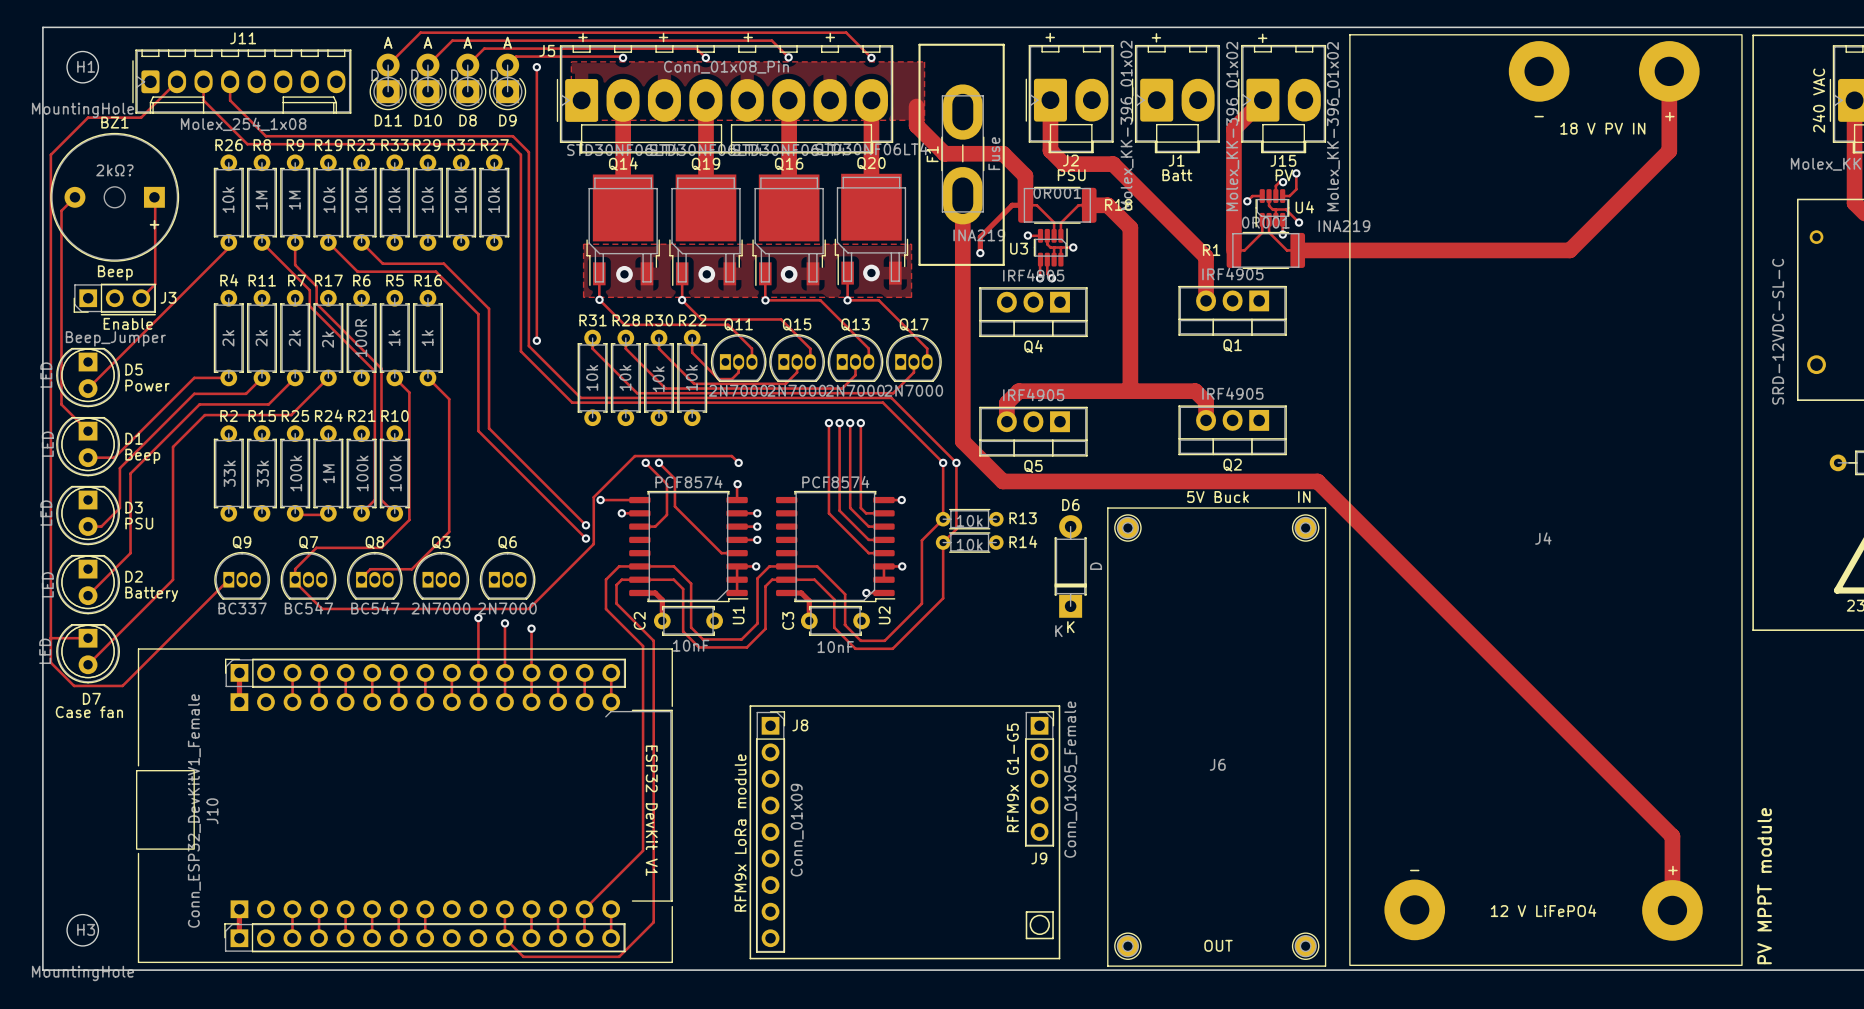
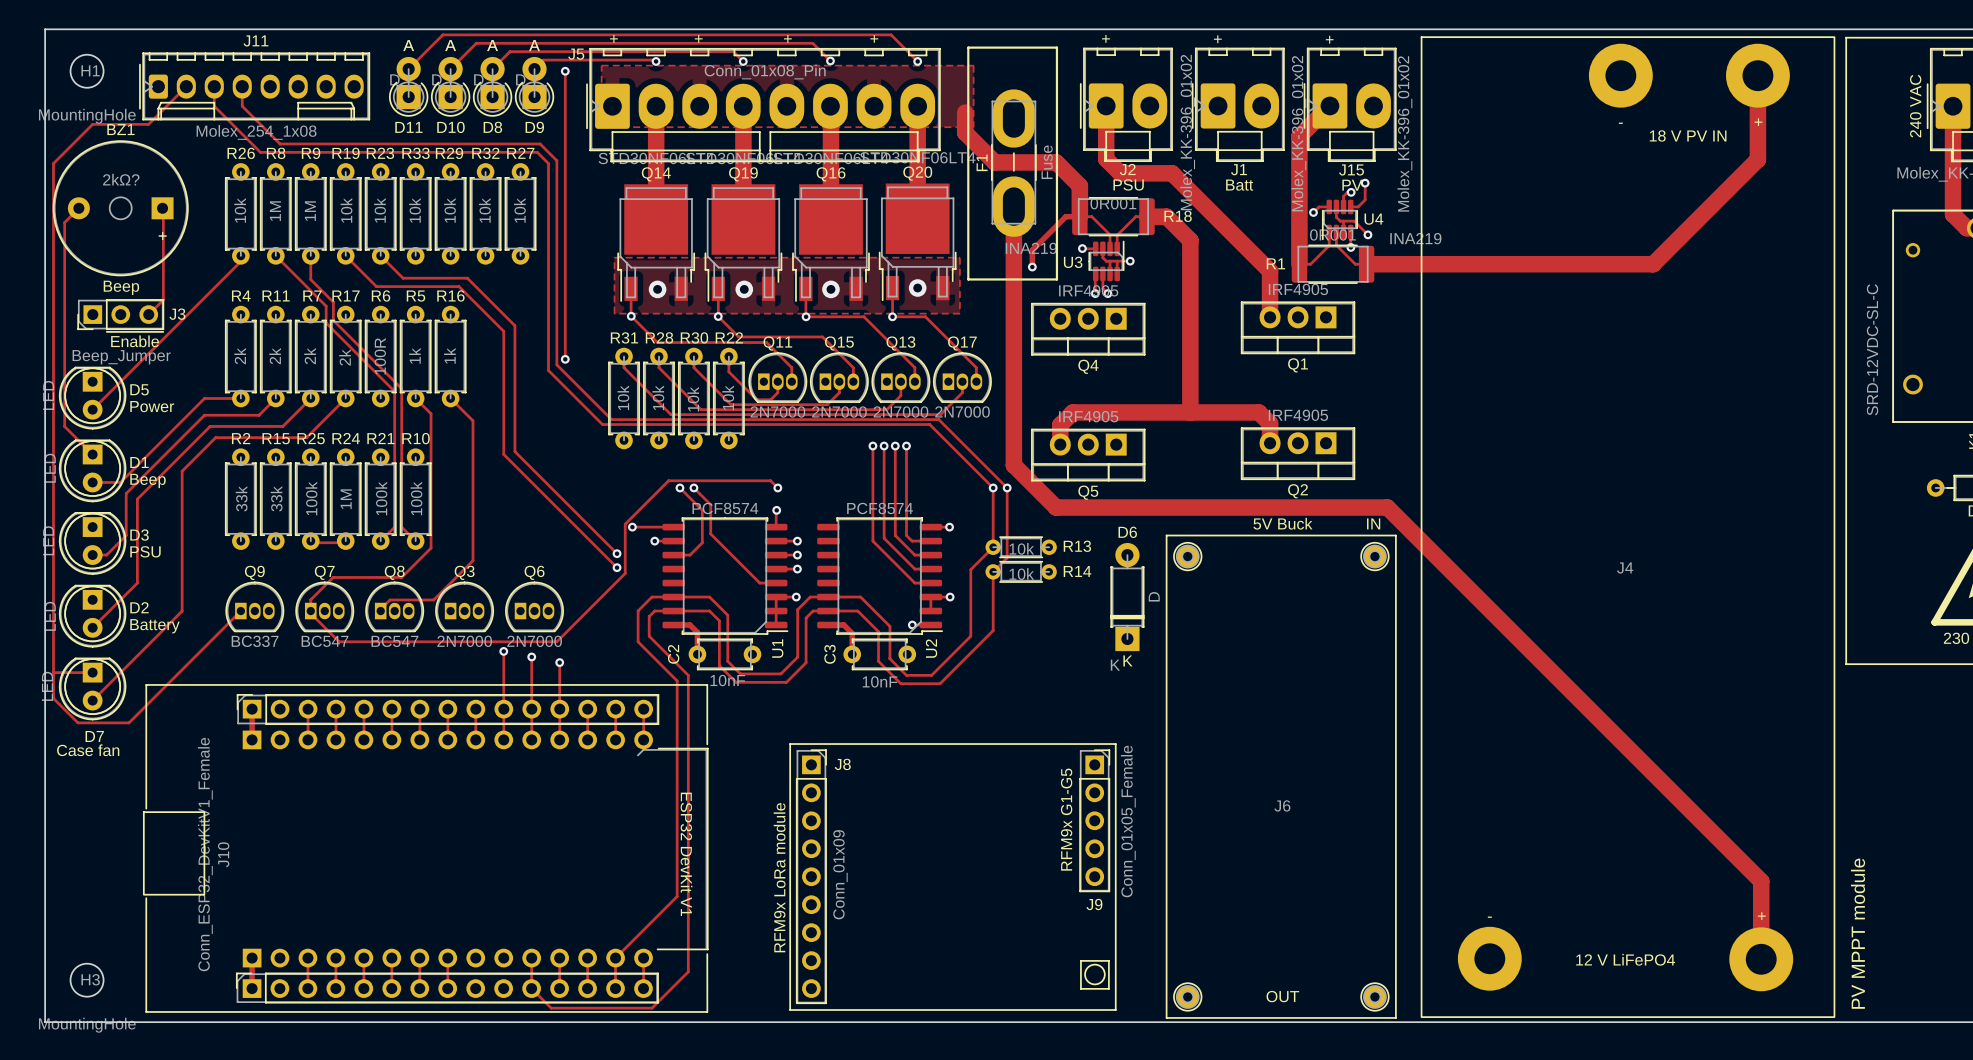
J10 footprint: [136, 648, 673, 963] -> [143, 684, 709, 1013]

